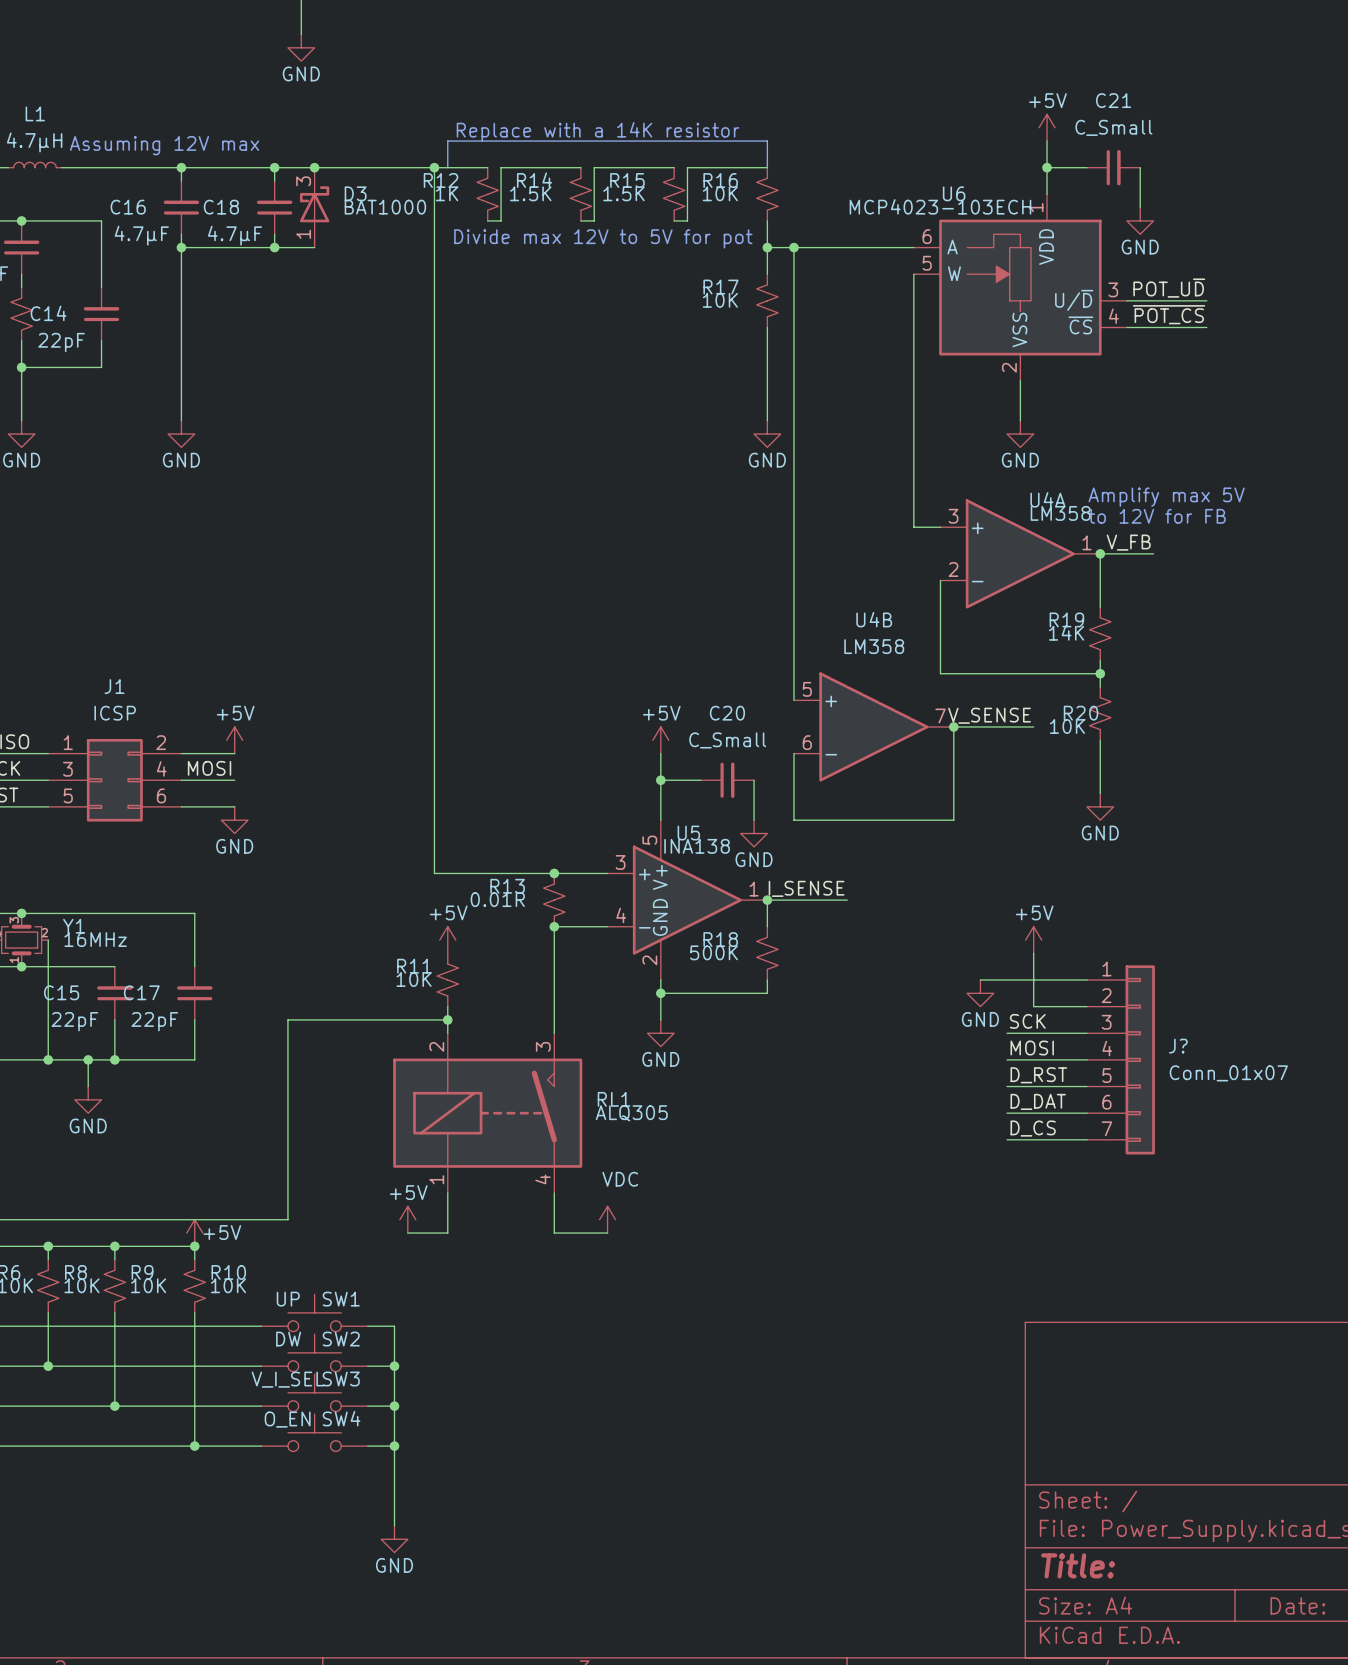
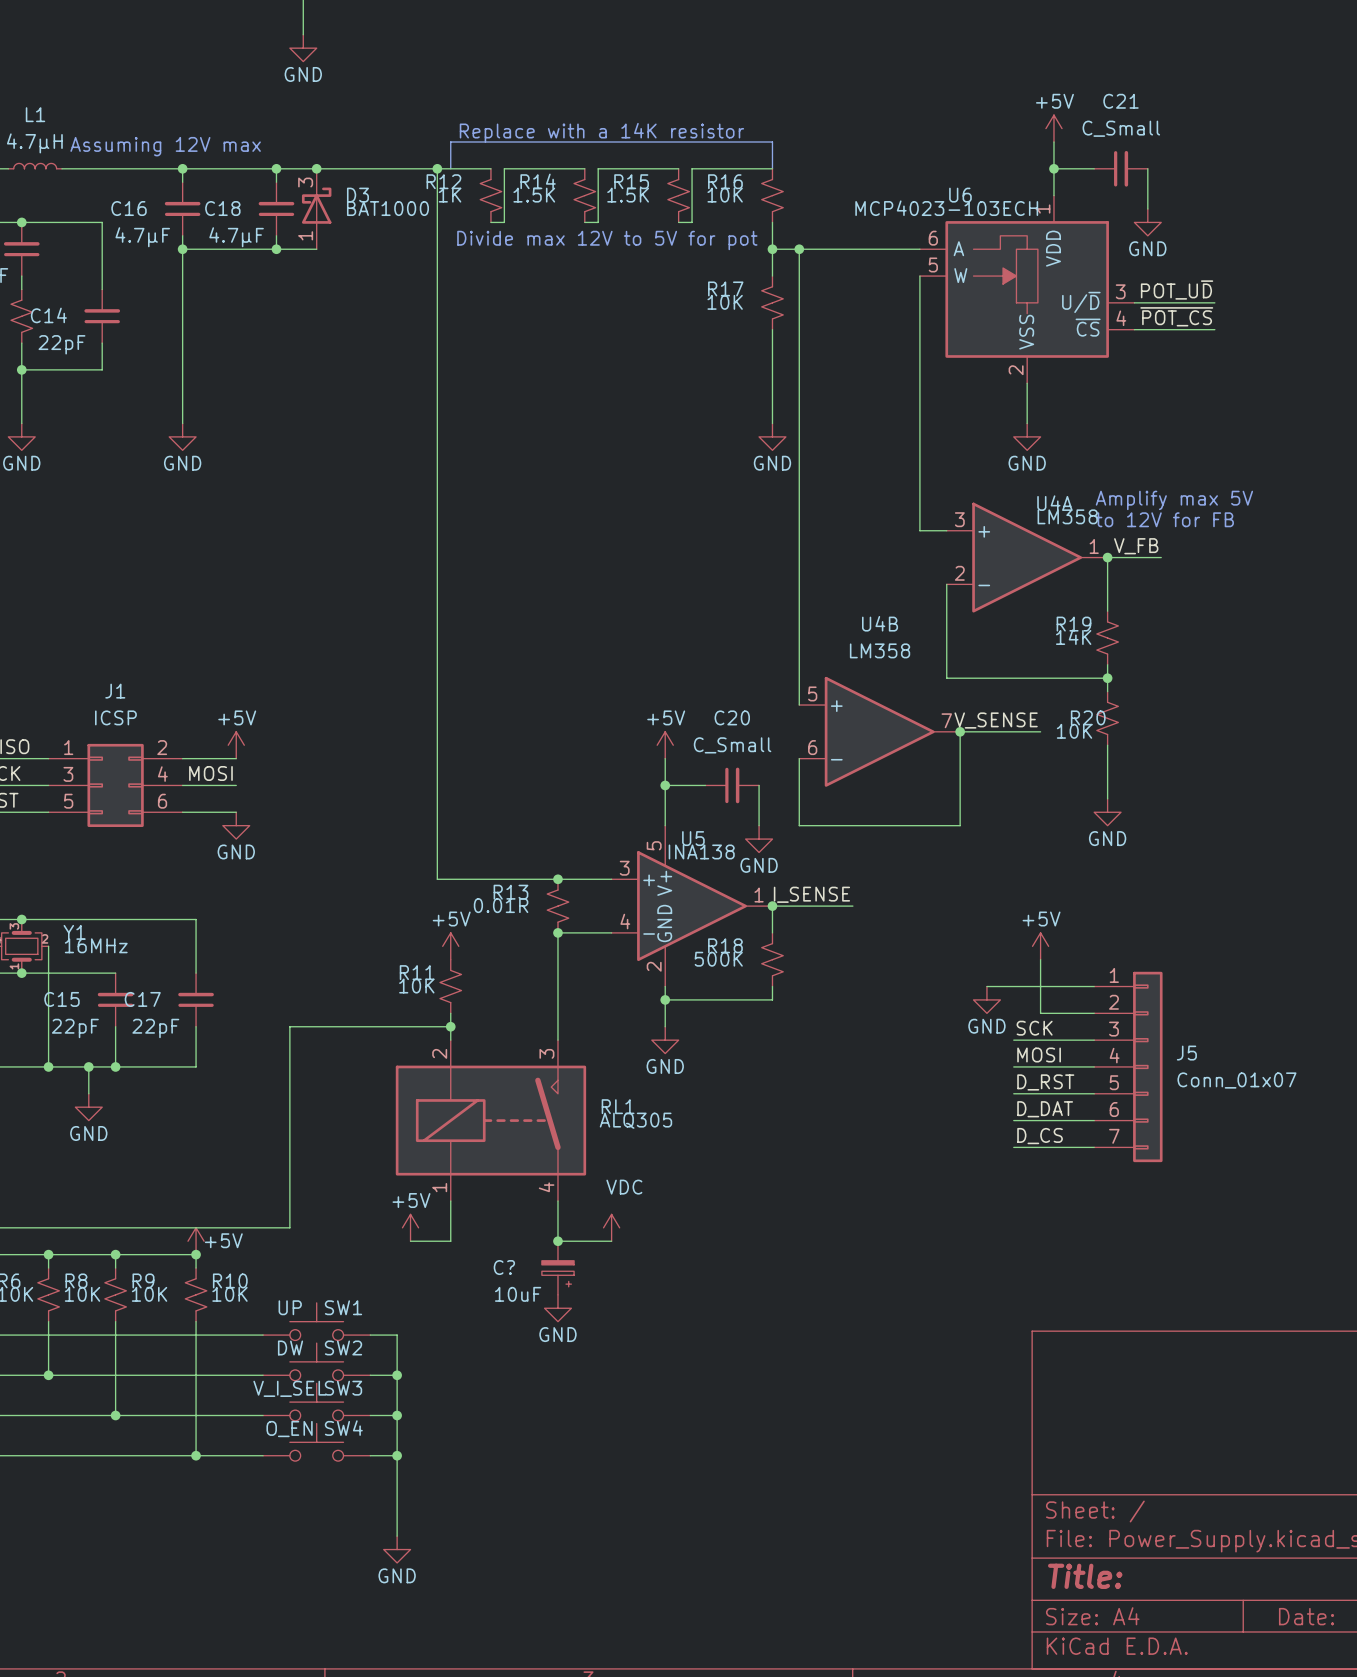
J? name: J? (1178, 1046) -> J5 (1186, 1053)
junction: none -> (557, 1241)
C?: none -> 10uF (557, 1268)
power symbol: none -> GND (557, 1308)

